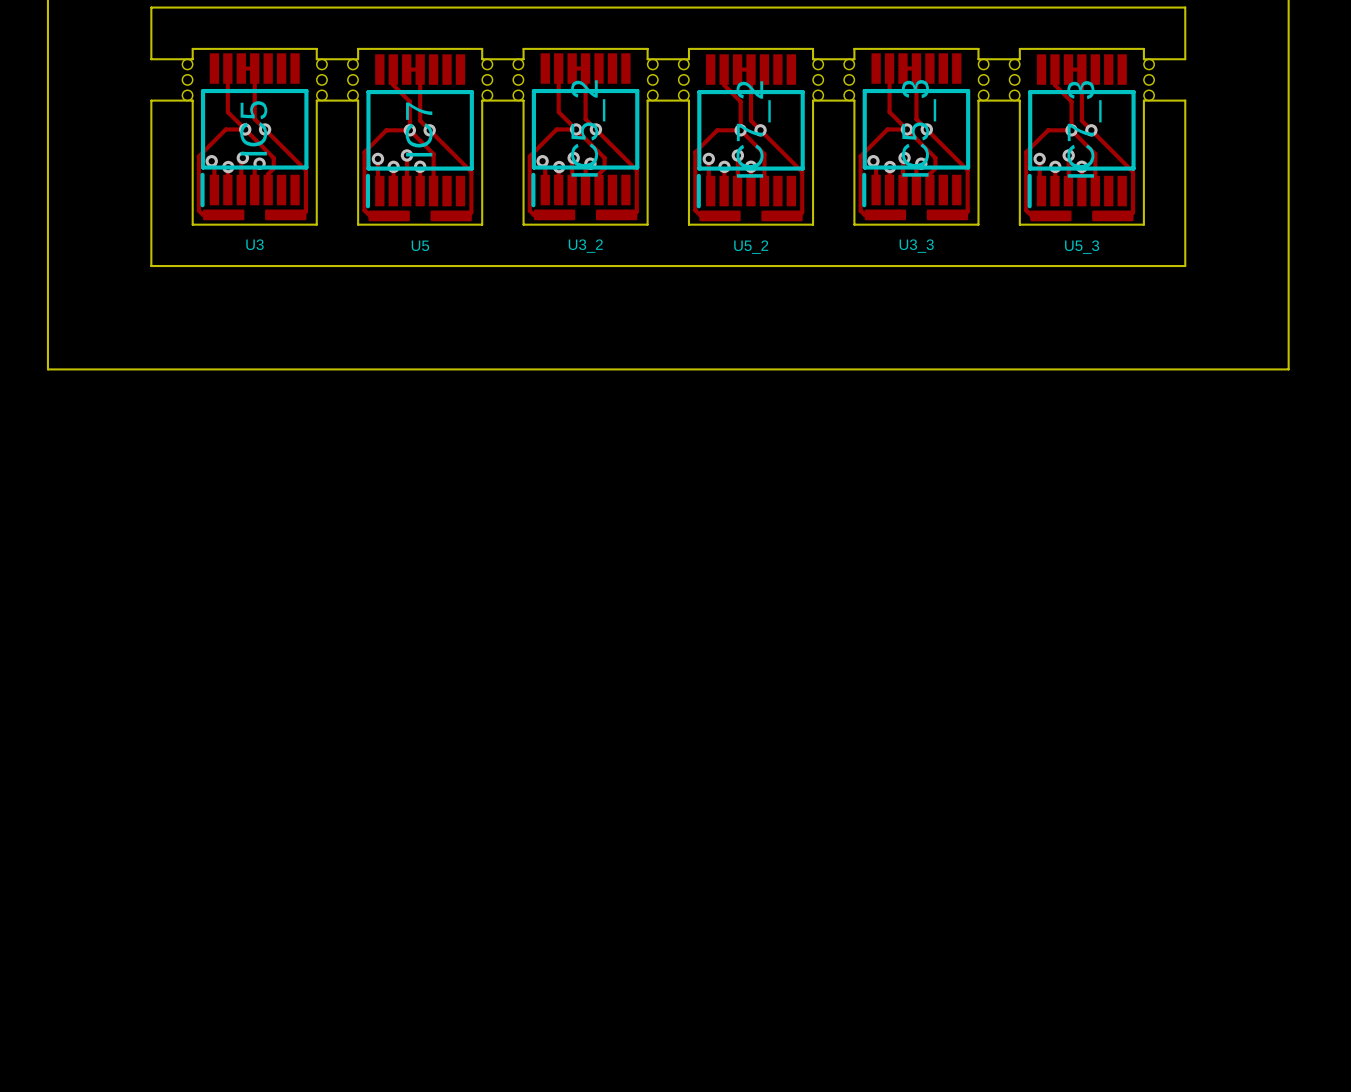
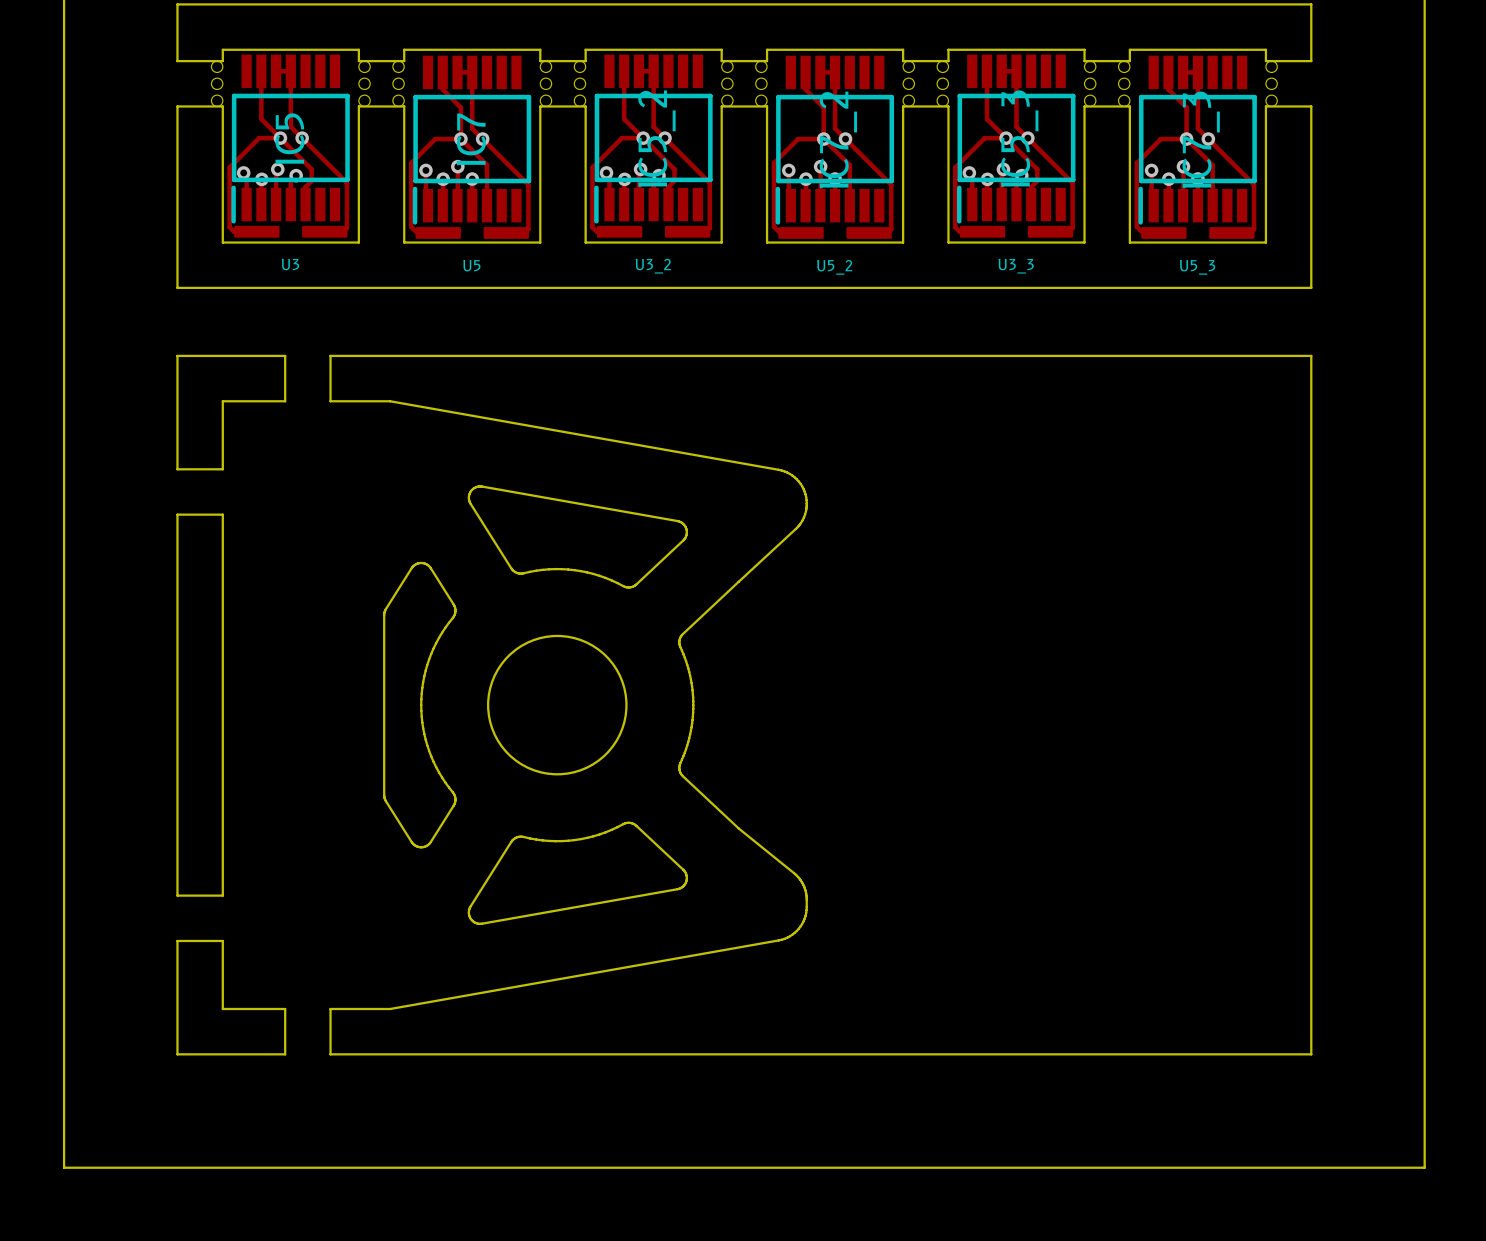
board edge: (47, 369) (192, 369) -> (285, 401) (285, 355) (177, 355) (177, 469) (222, 469) (222, 401)
board edge: (249, 369) (290, 369) -> (390, 401) (778, 469) (789, 473) (798, 481) (804, 491) (806, 503) (805, 514) (799, 525) (679, 638) (679, 645) (690, 679) (693, 705) (690, 734) (679, 768) (682, 776) (738, 828) (798, 877) (805, 892) (806, 910) (803, 921) (796, 930) (787, 937) (778, 940) (390, 1009) (330, 1009) (330, 1054) (1311, 1054) (1311, 355) (330, 355) (330, 401)
board edge: (345, 369) (1288, 369) -> (64, 401) (64, 1167) (1424, 1167) (1424, 401)
board edge: none -> (480, 486) (470, 491) (469, 502) (511, 568) (518, 573) (549, 569) (574, 570) (599, 575) (624, 586) (631, 587) (683, 540) (686, 535) (685, 526) (677, 521) (480, 486)
board edge: none -> (177, 514) (177, 895) (222, 895) (222, 514) (177, 514)
board edge: none -> (421, 562) (411, 568) (385, 609) (384, 615) (384, 796) (412, 843) (421, 847) (430, 842) (453, 805) (455, 798) (439, 772) (429, 750) (423, 728) (421, 705) (423, 681) (429, 659) (439, 637) (453, 616) (455, 609) (429, 567) (421, 562)
round board edge: none -> [487, 634, 628, 776]
board edge: none -> (628, 822) (599, 834) (574, 840) (549, 840) (521, 836) (515, 838) (470, 906) (468, 912) (470, 918) (475, 922) (482, 923) (677, 889) (683, 886) (686, 879) (684, 870) (636, 825) (628, 822)
board edge: none -> (177, 940) (177, 1054) (285, 1054) (285, 1009) (222, 1009) (222, 940) (177, 940)

